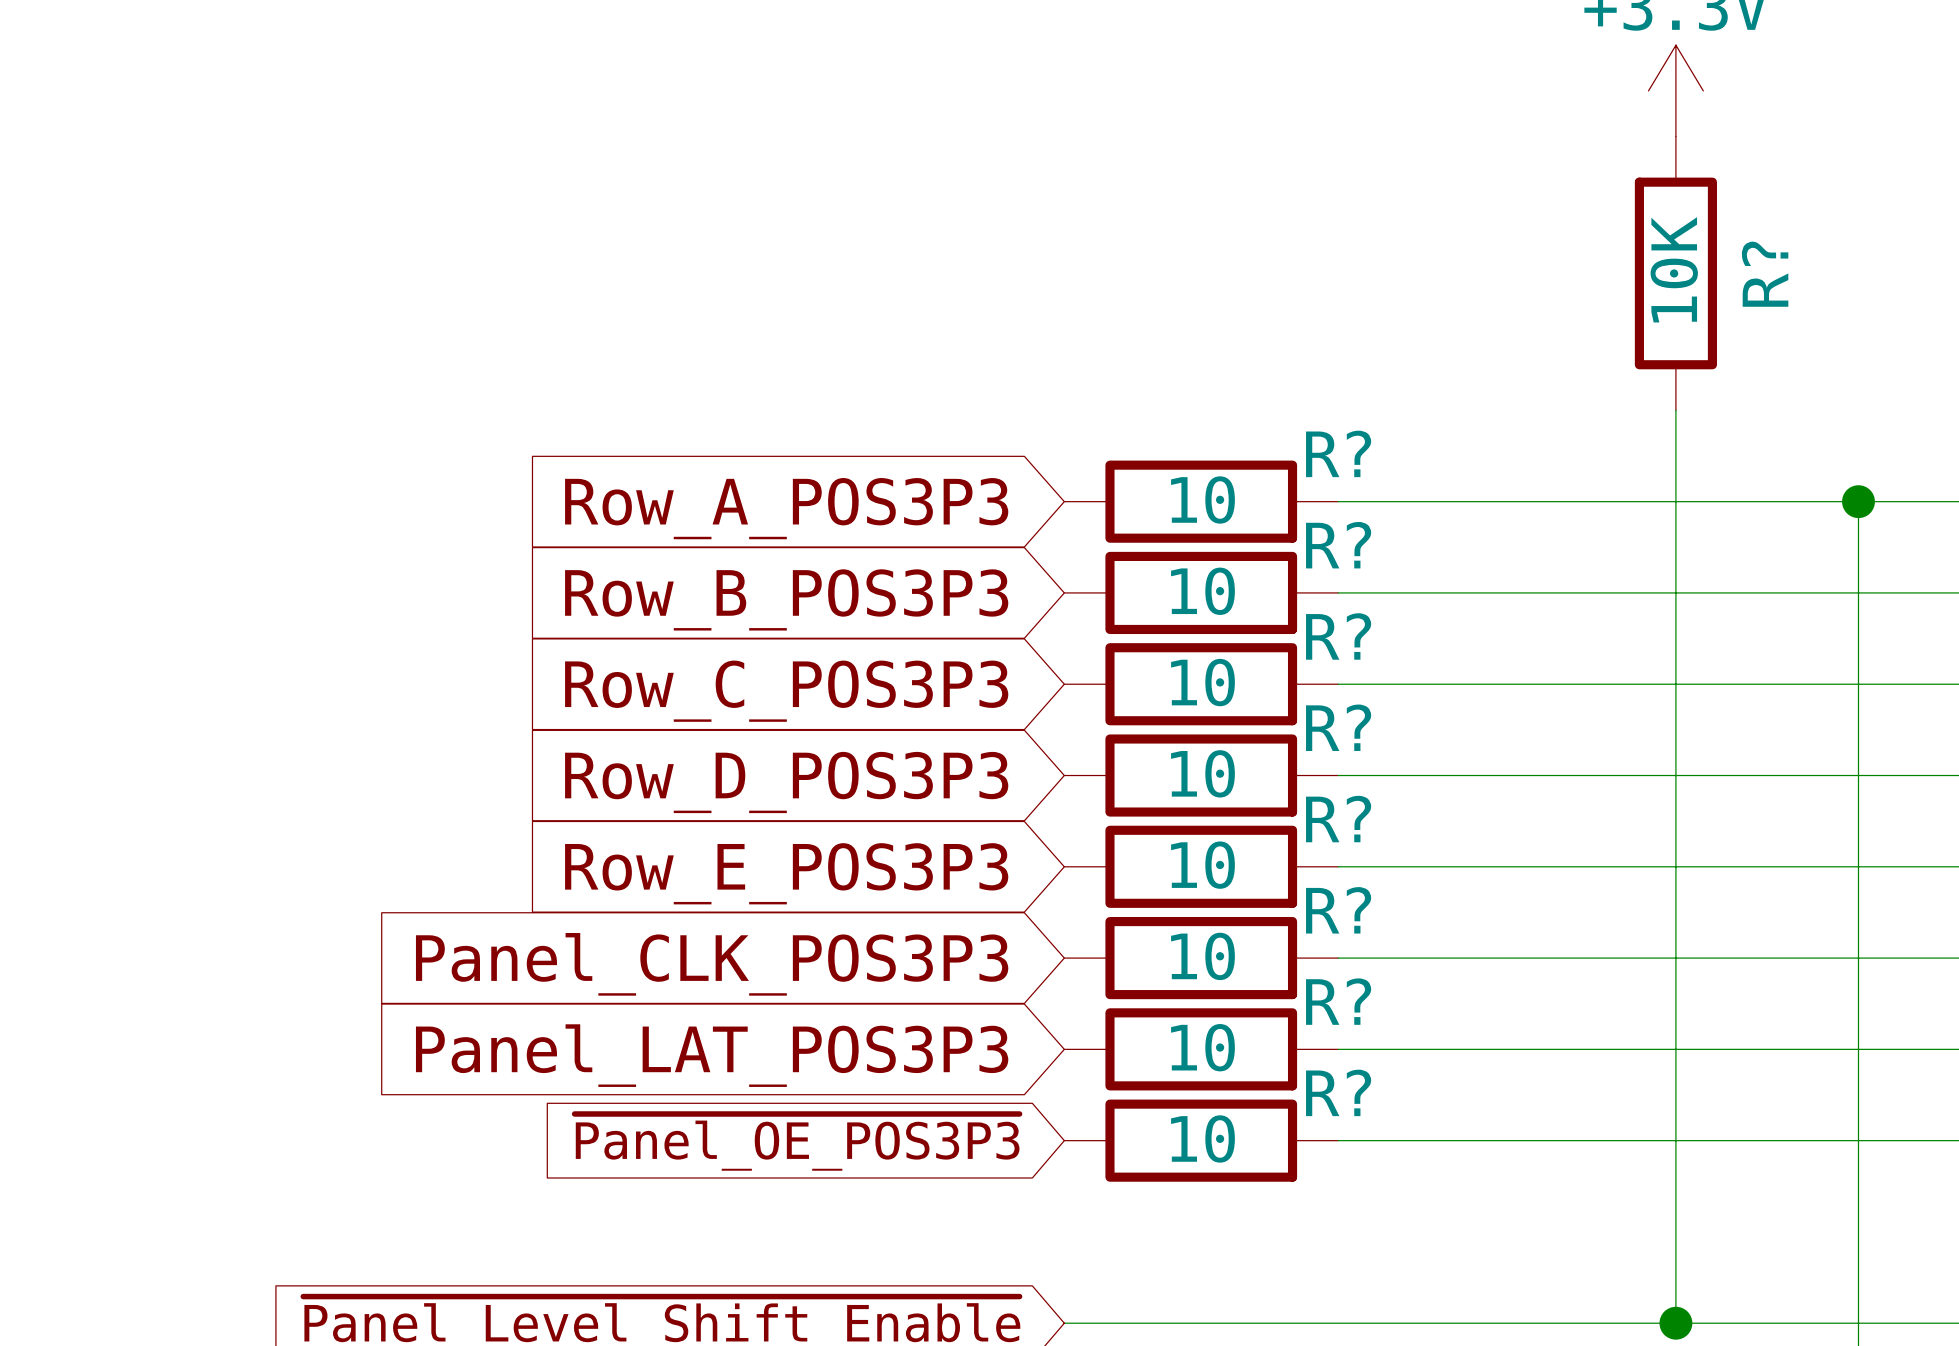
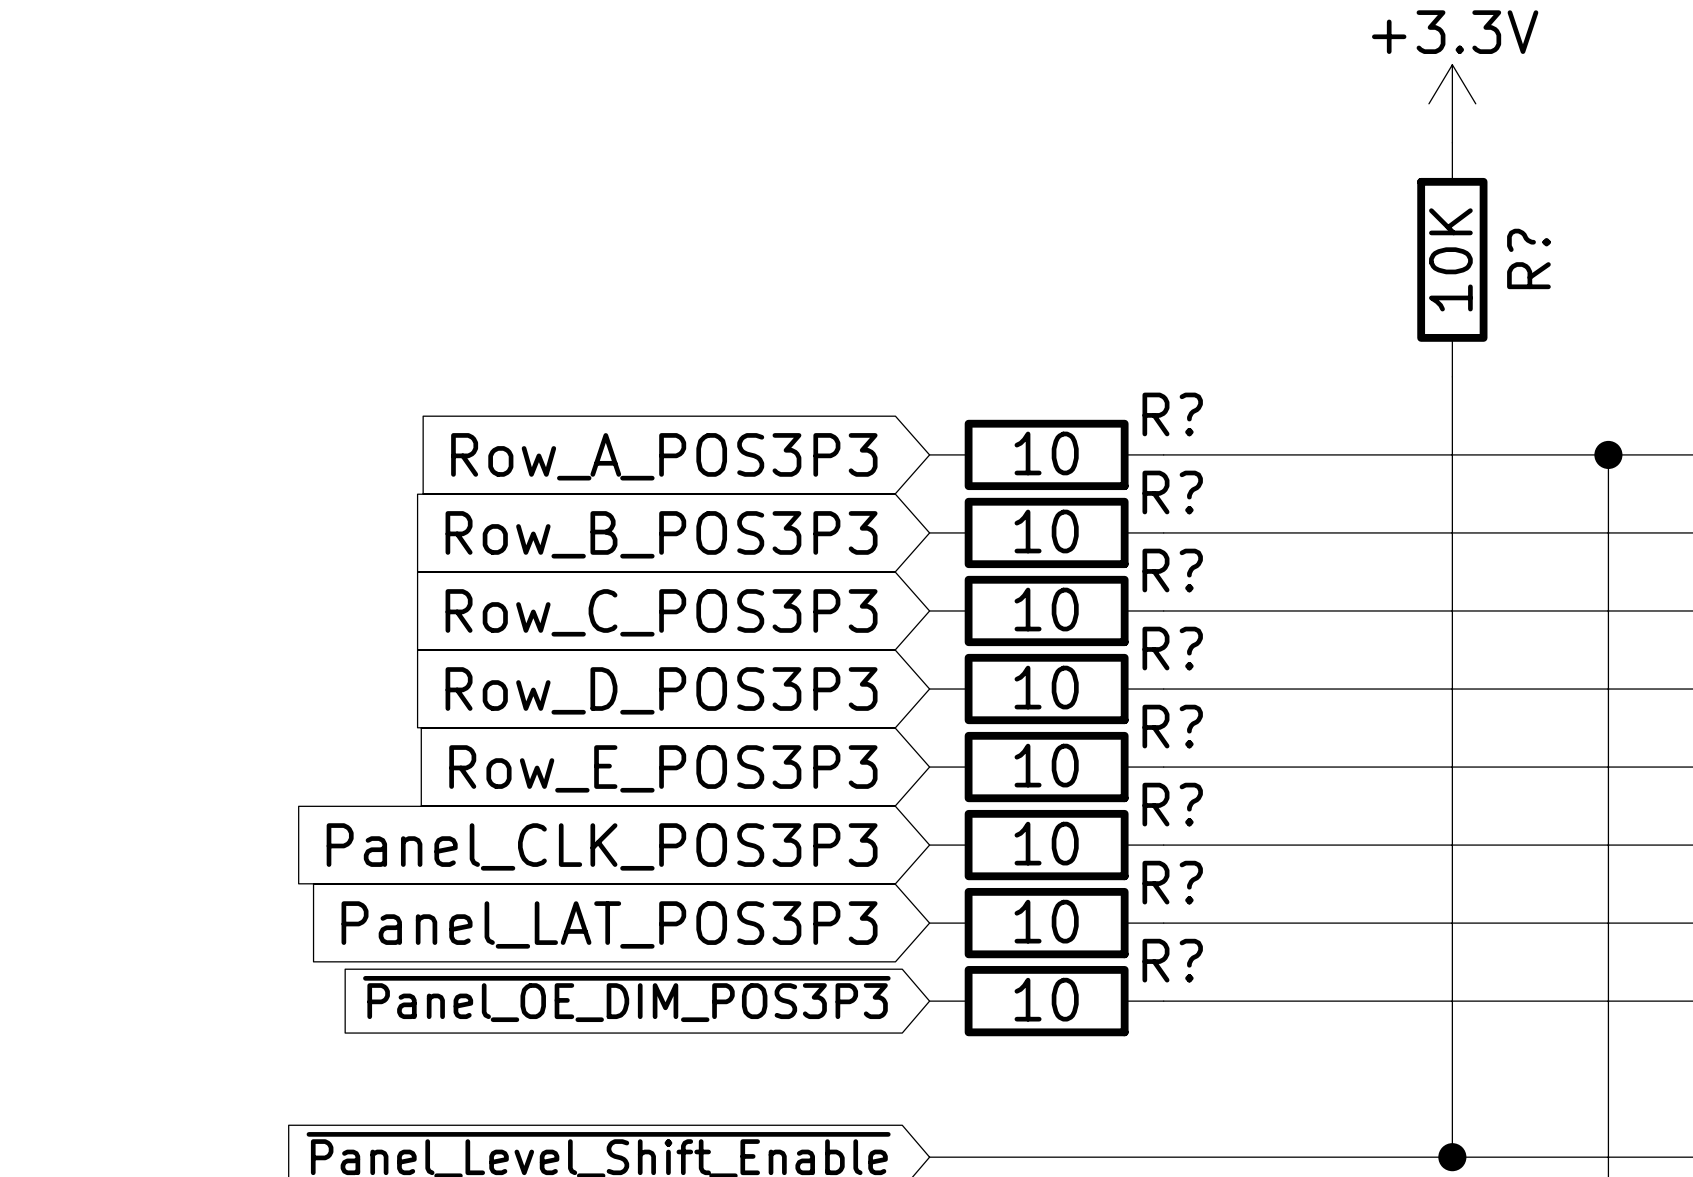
global label: ~{Panel_OE_POS3P3} (797, 1142) -> ~{Panel_OE_DIM_POS3P3} (626, 999)

